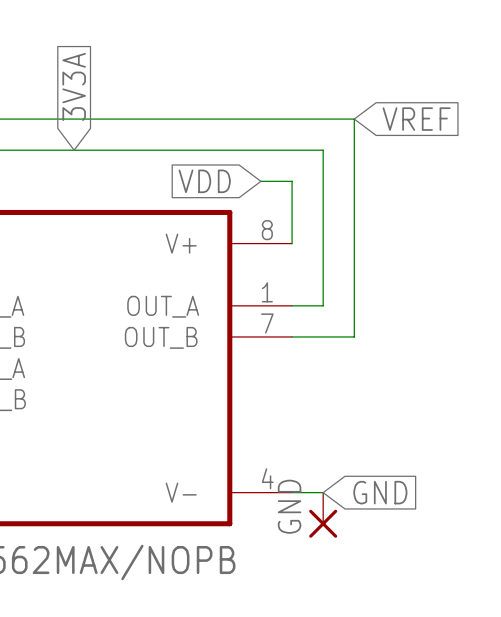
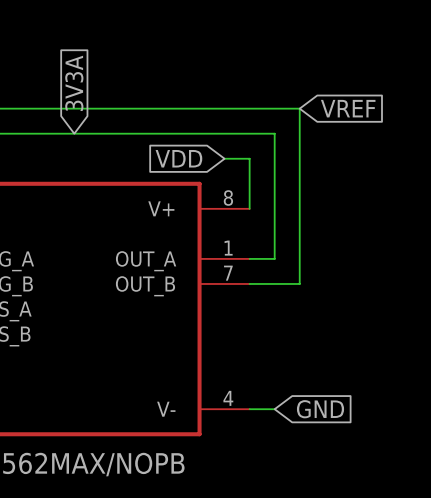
GND: (323, 515) -> none

